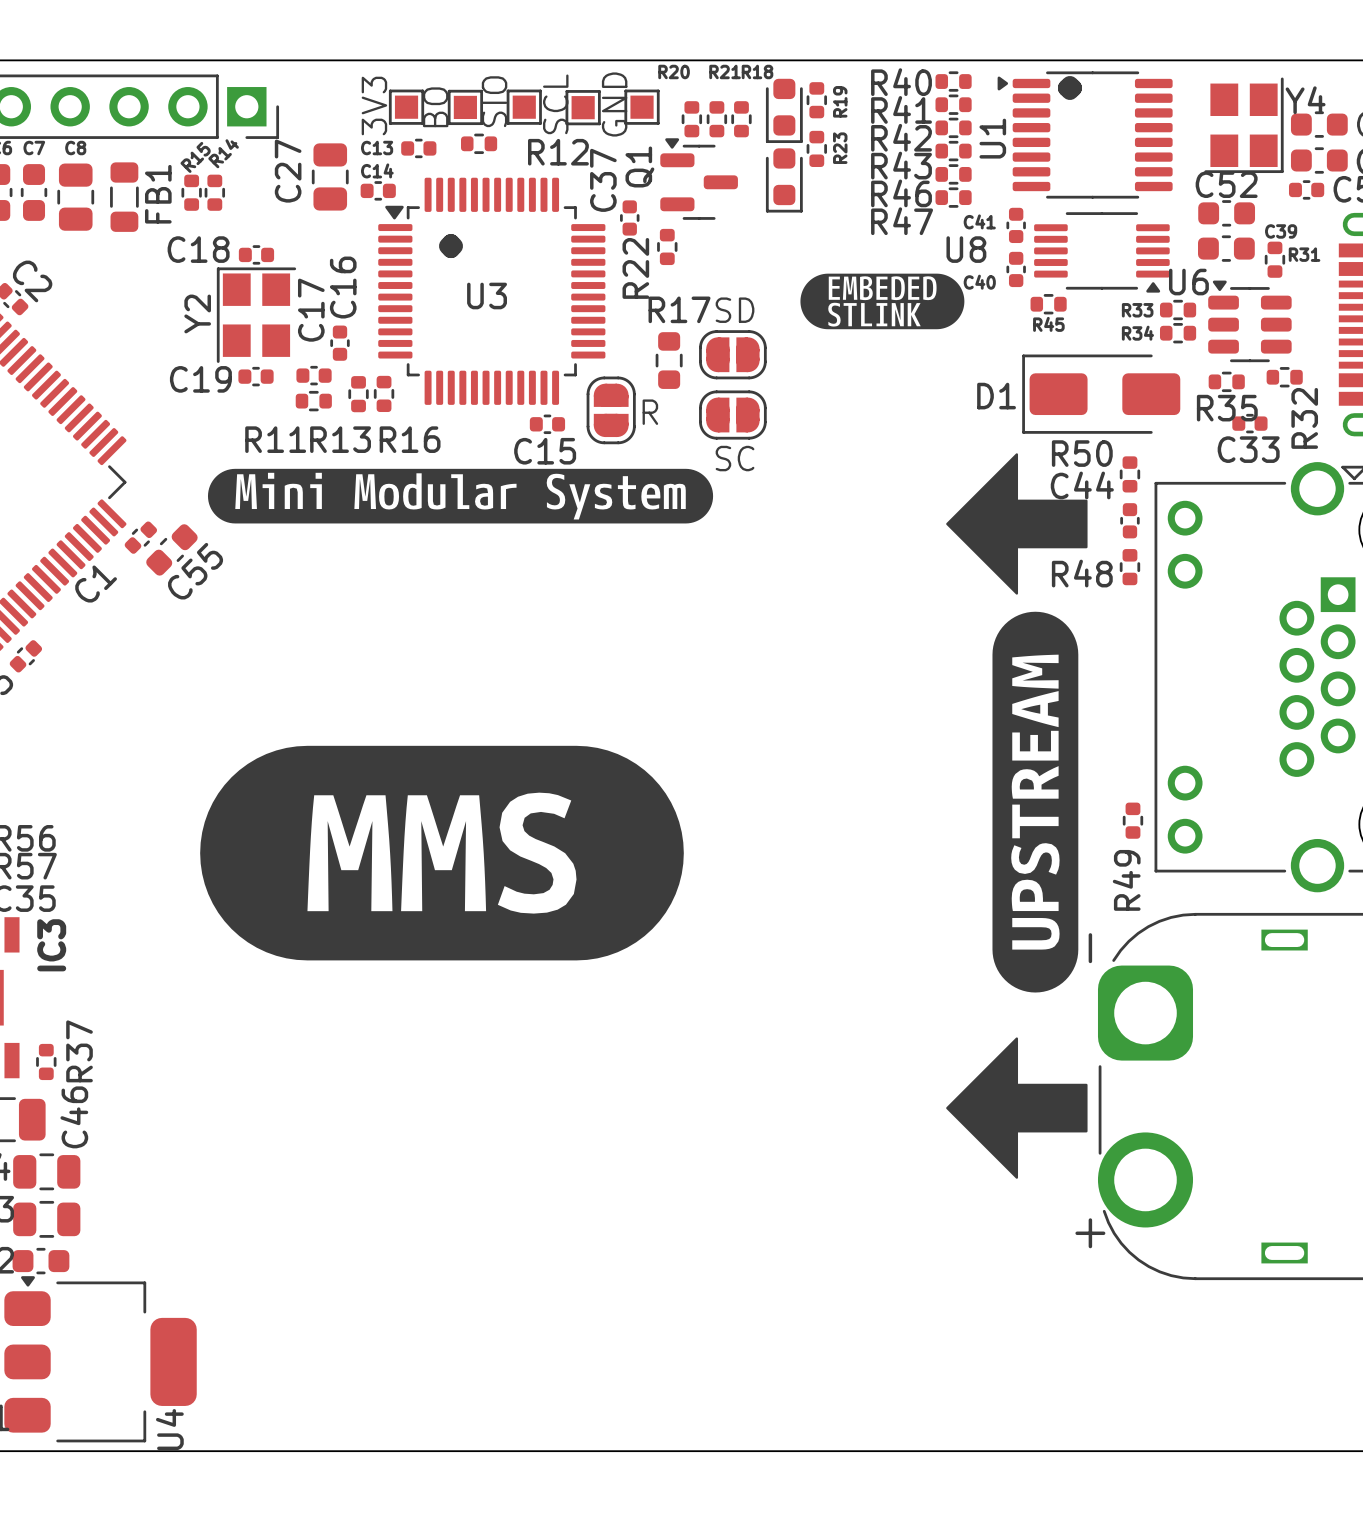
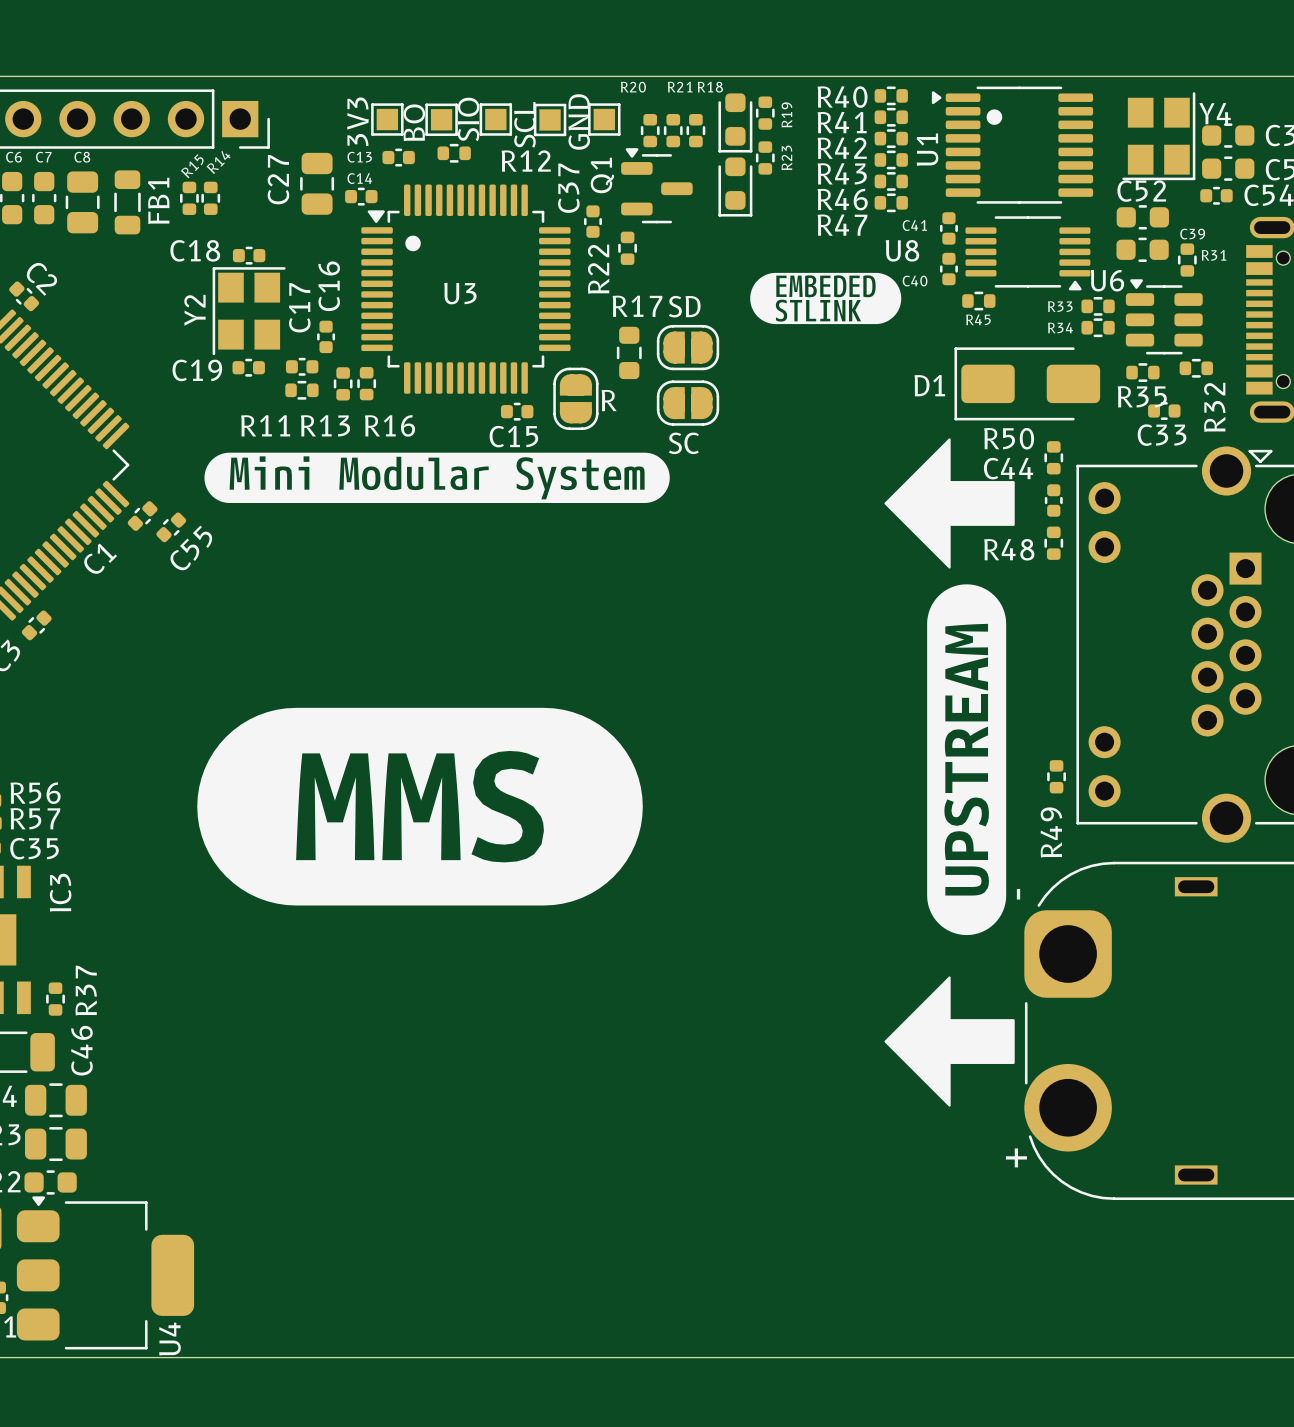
C55 footprint: [146, 524, 198, 576] -> [156, 512, 187, 543]

